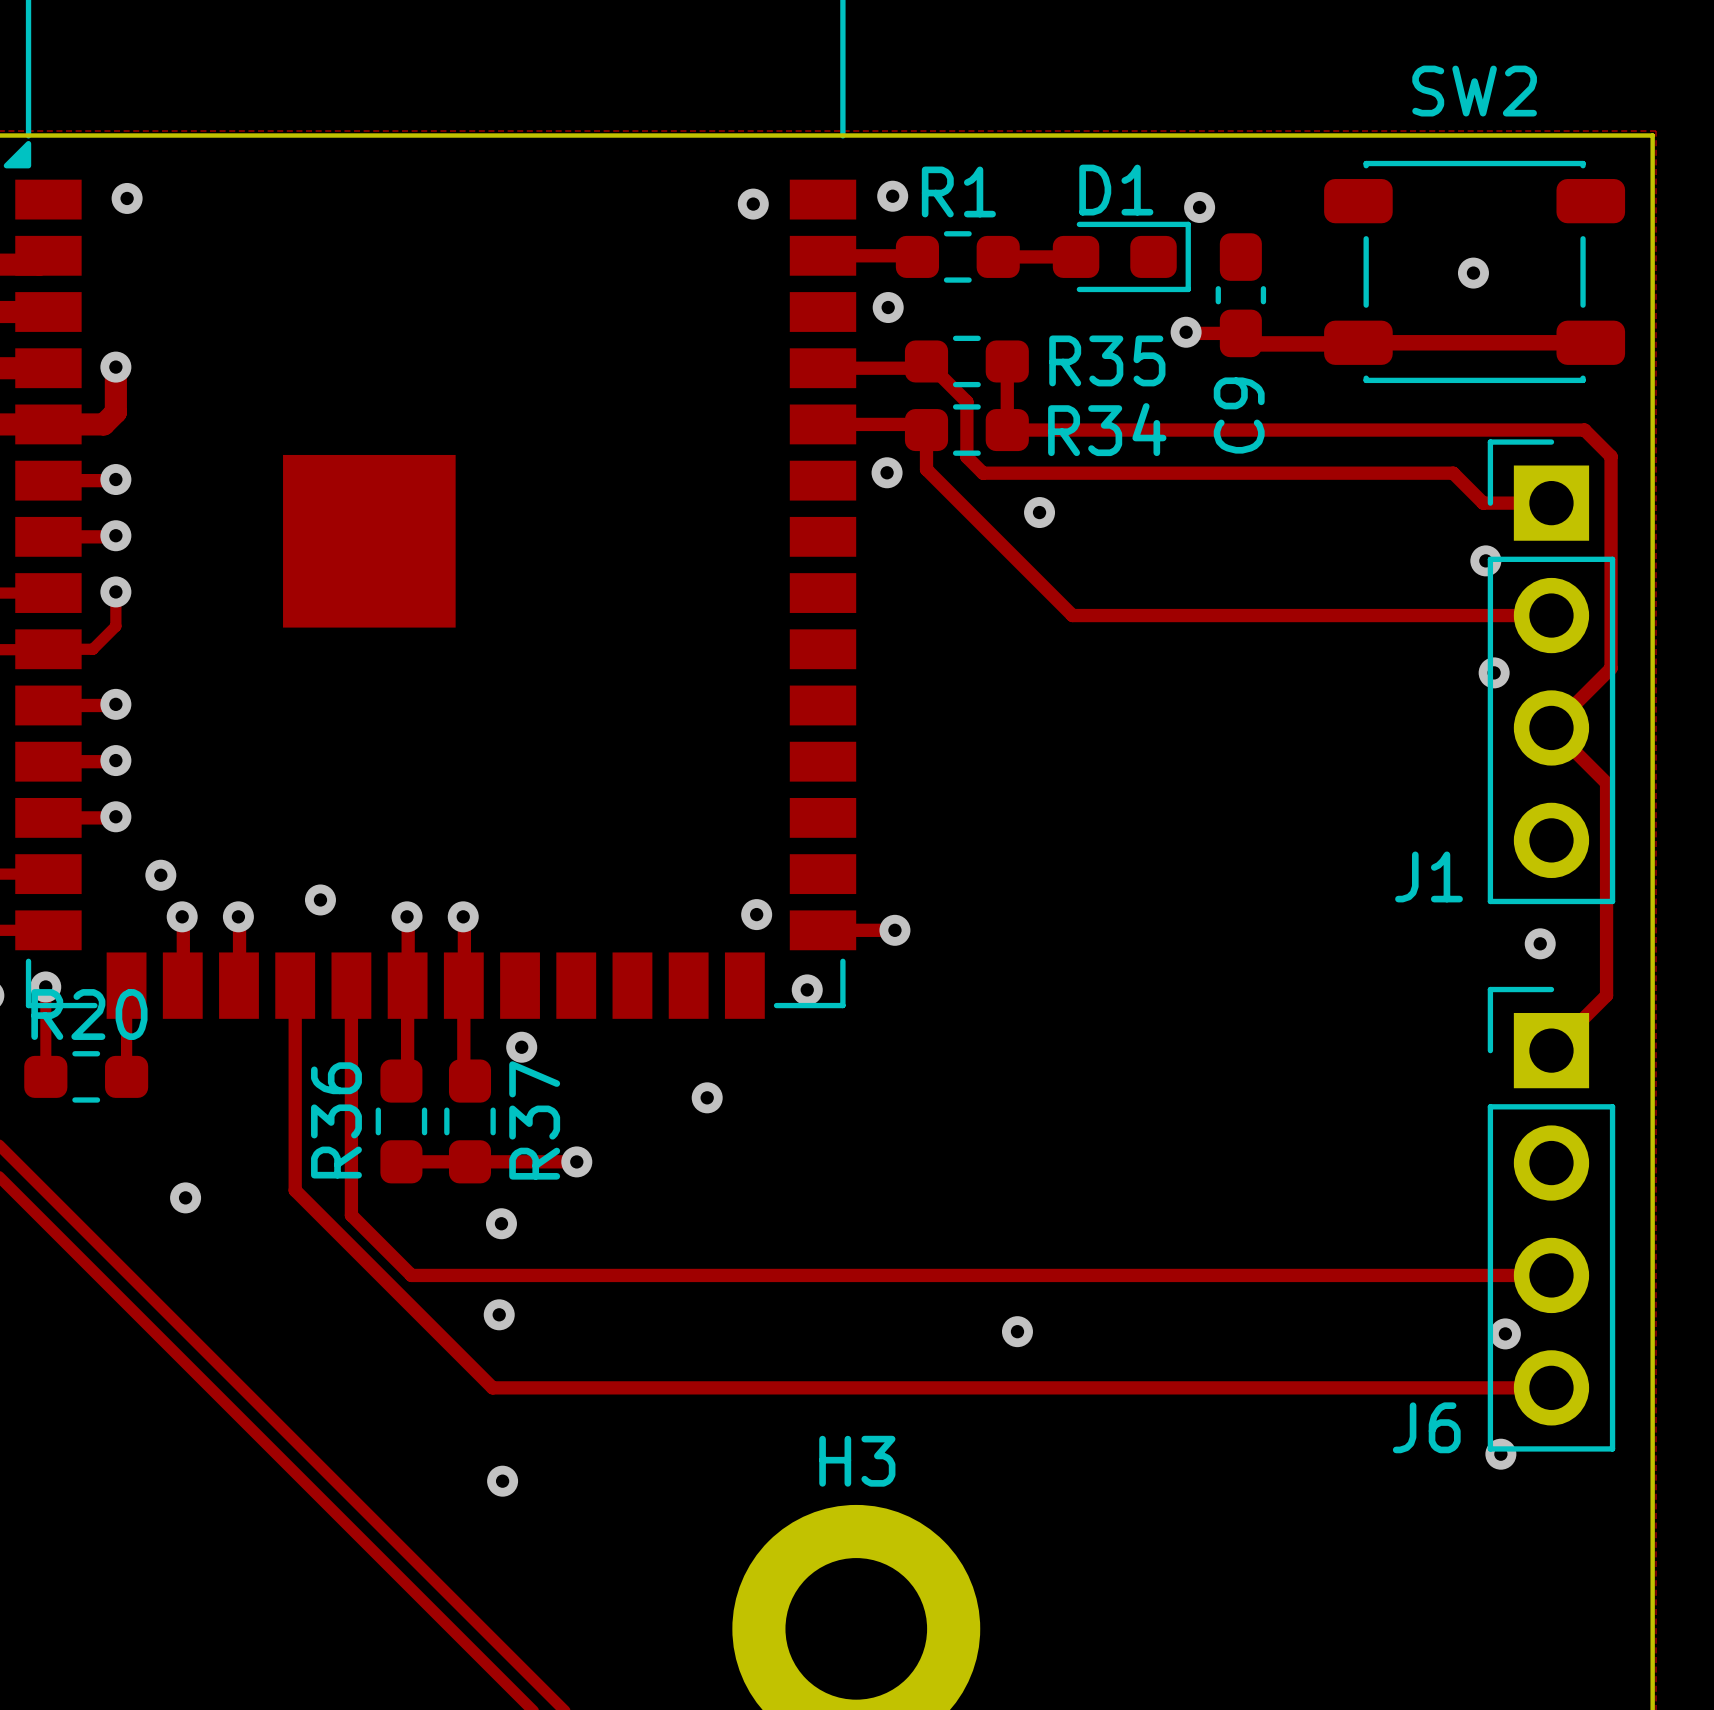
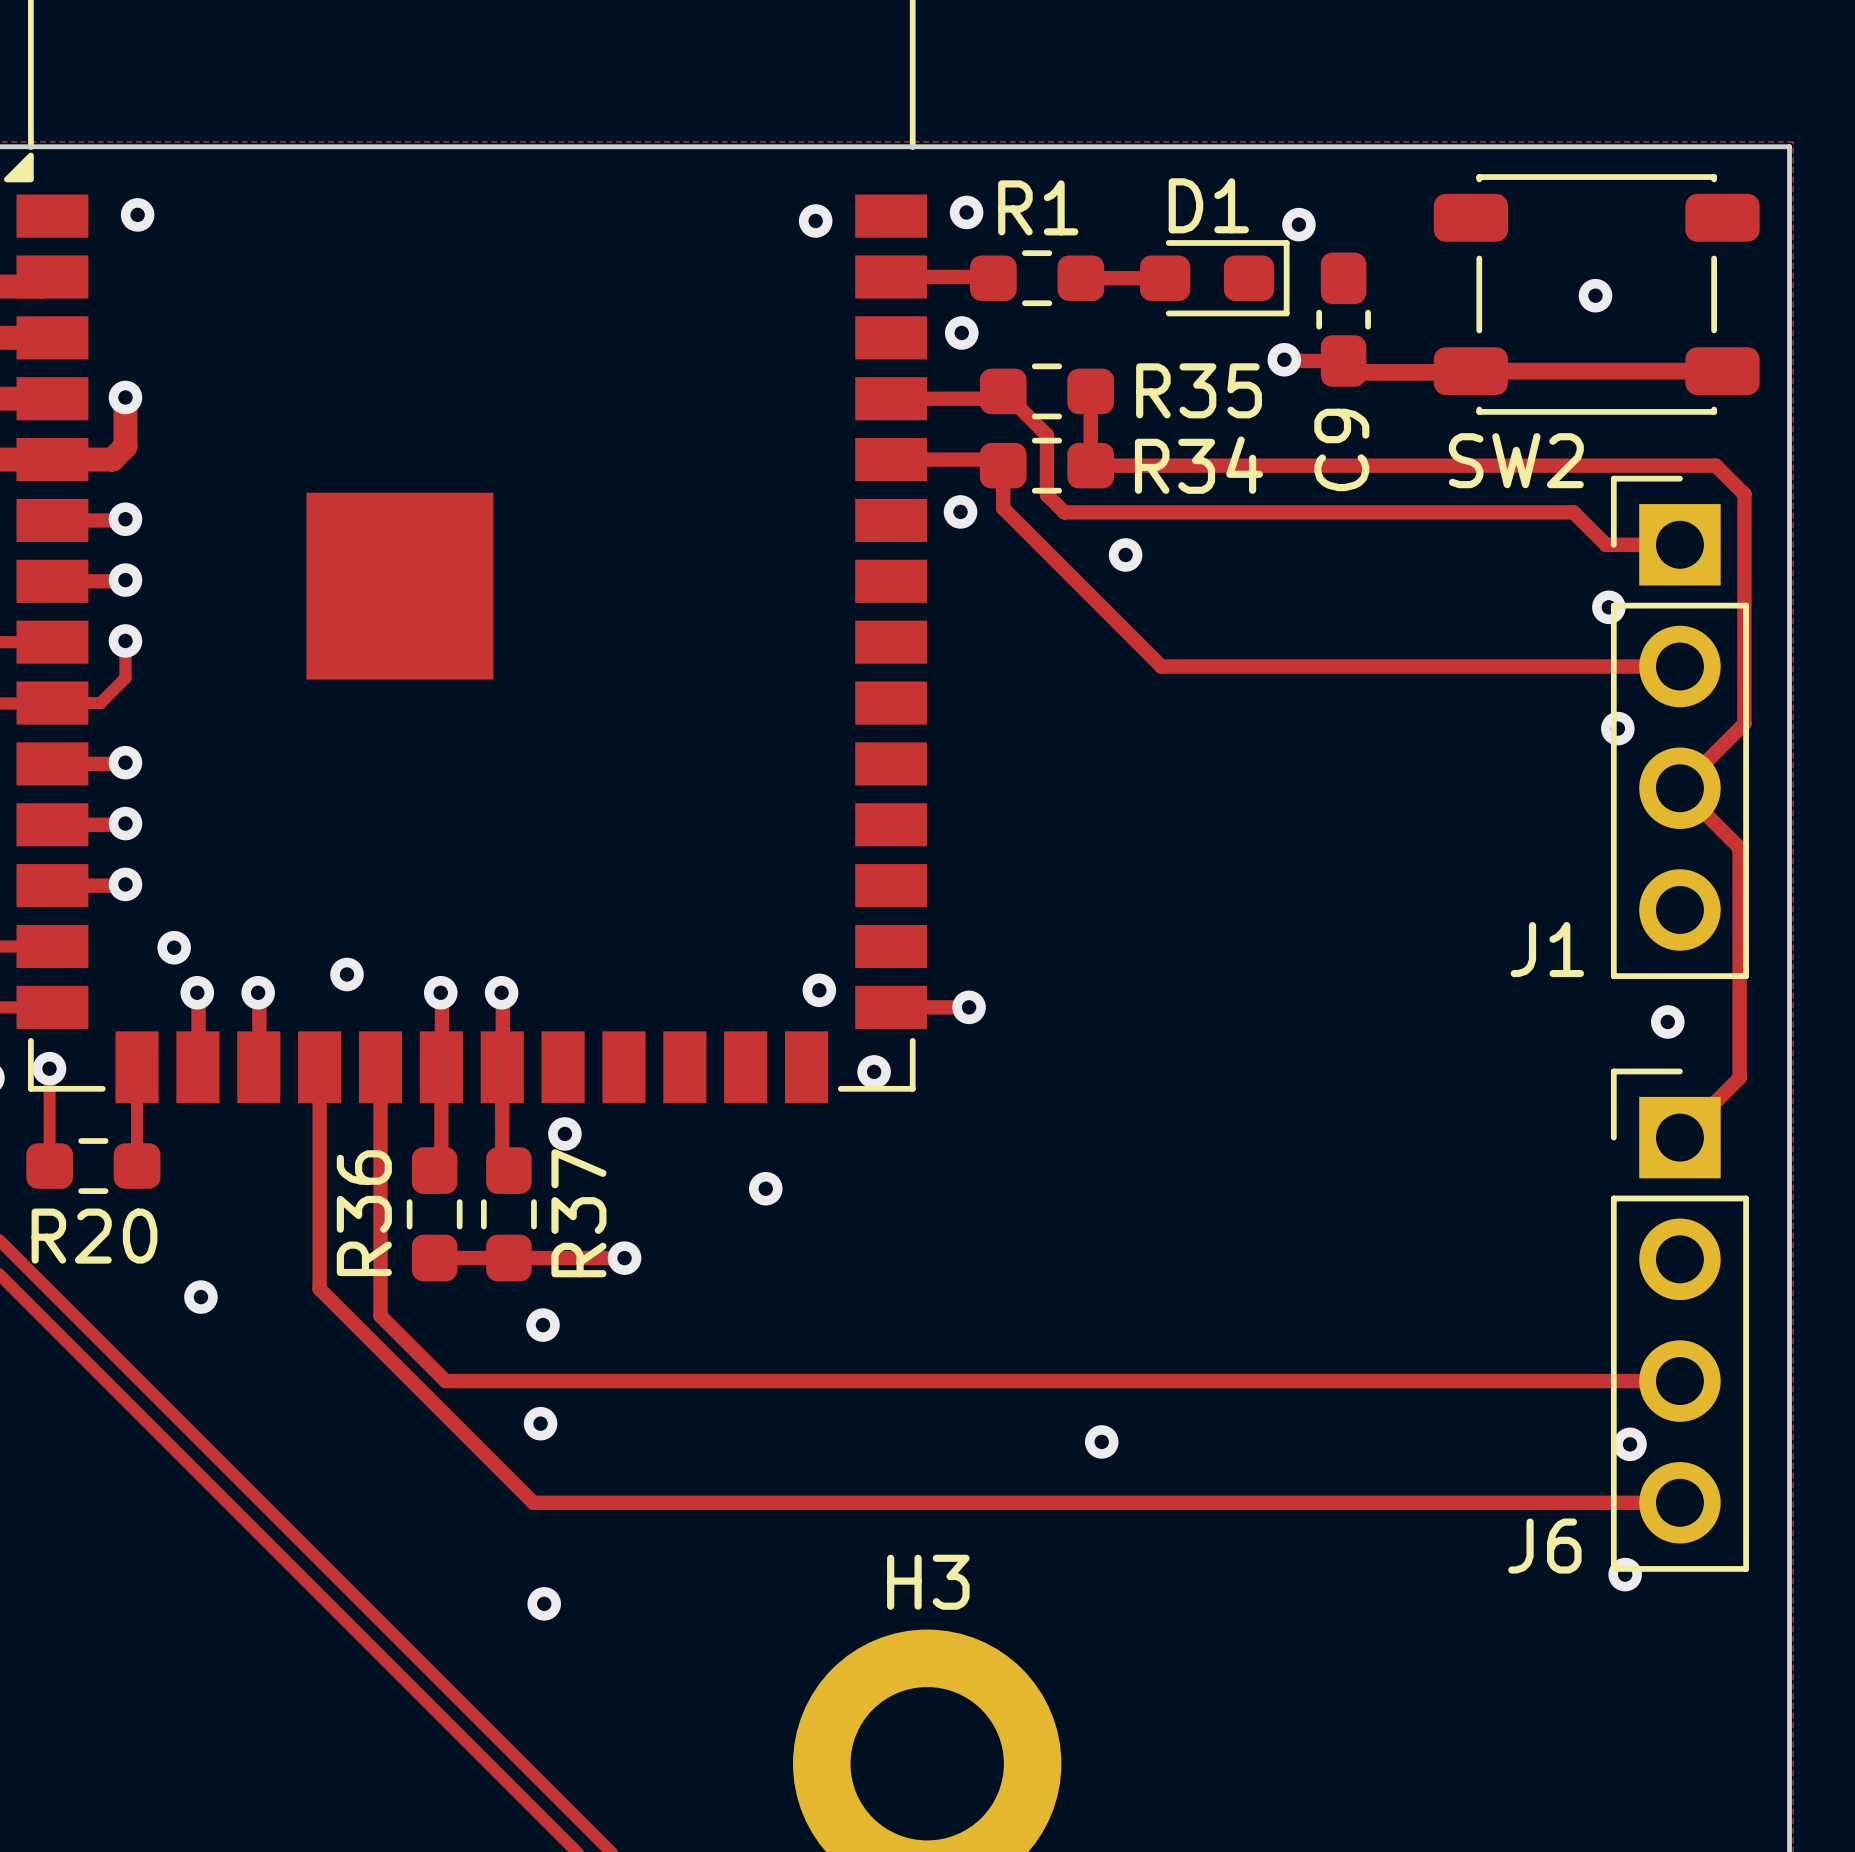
SW2 name position: SW2 (1474, 91) -> SW2 (1516, 460)
R20 name position: R20 (89, 1014) -> R20 (94, 1236)

